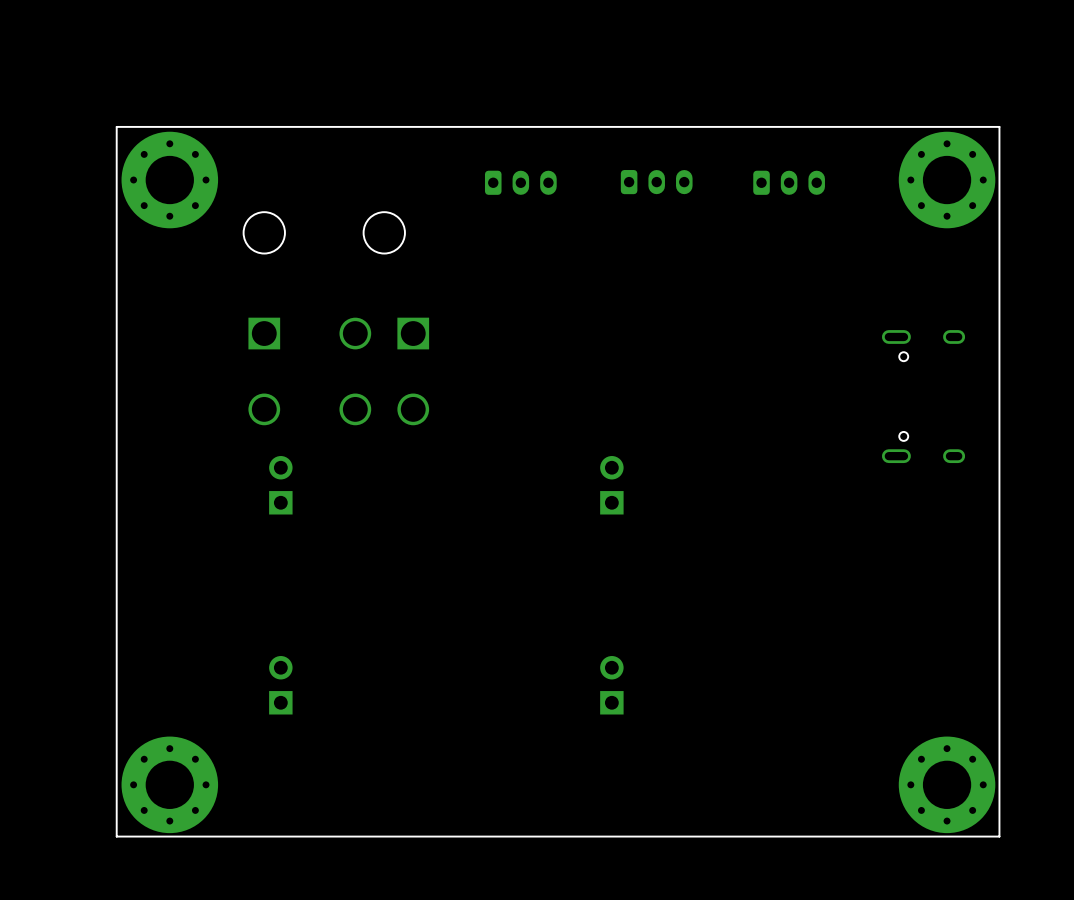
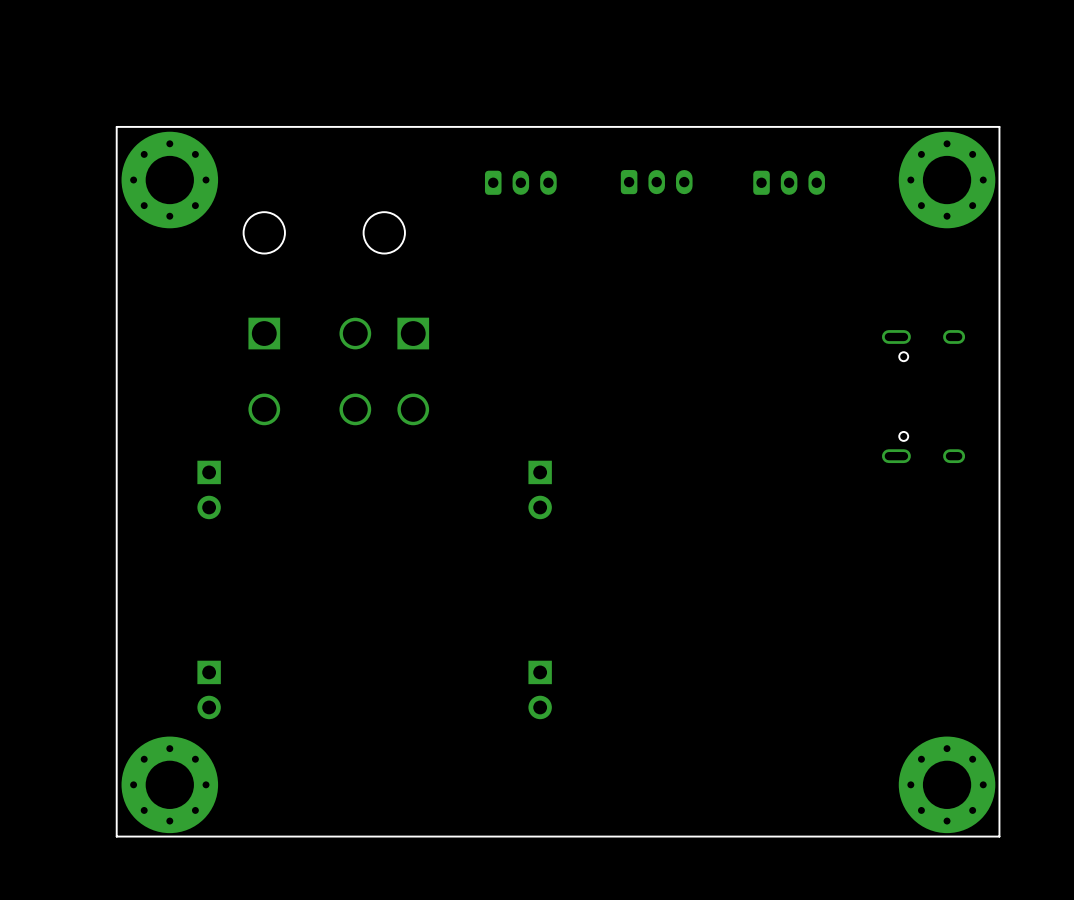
part rotation: 0° (280, 485) -> 180° (209, 489)
part position: (280, 485) -> (209, 489)
part rotation: 0° (611, 485) -> 180° (540, 489)
part position: (611, 485) -> (540, 489)
part rotation: 0° (280, 685) -> 180° (209, 689)
part position: (280, 685) -> (209, 689)
part rotation: 0° (611, 685) -> 180° (540, 689)
part position: (611, 685) -> (540, 689)

